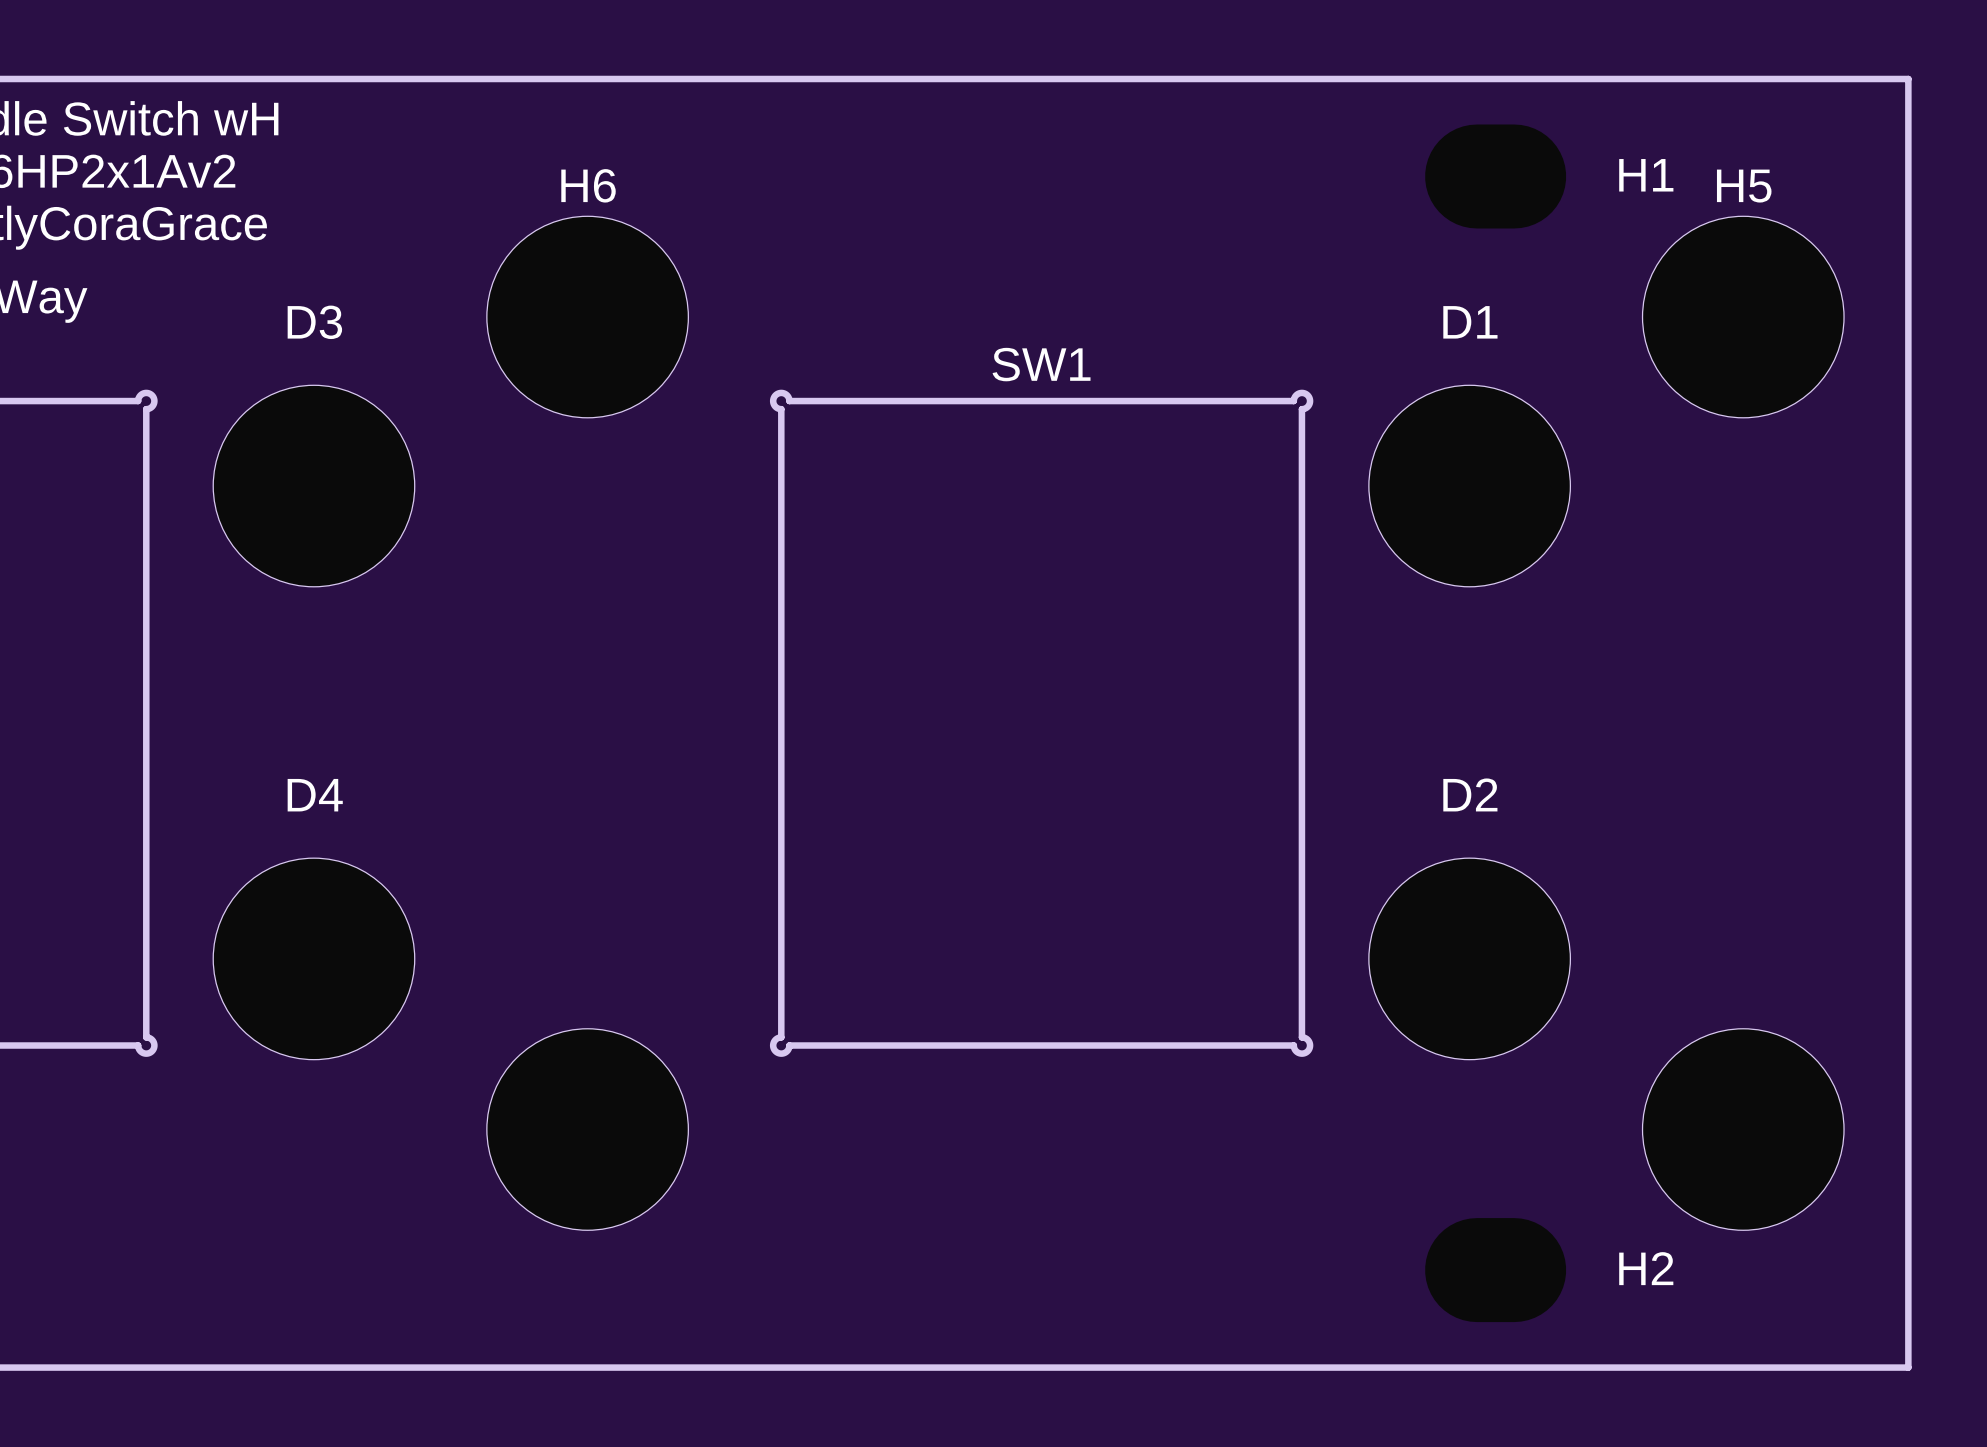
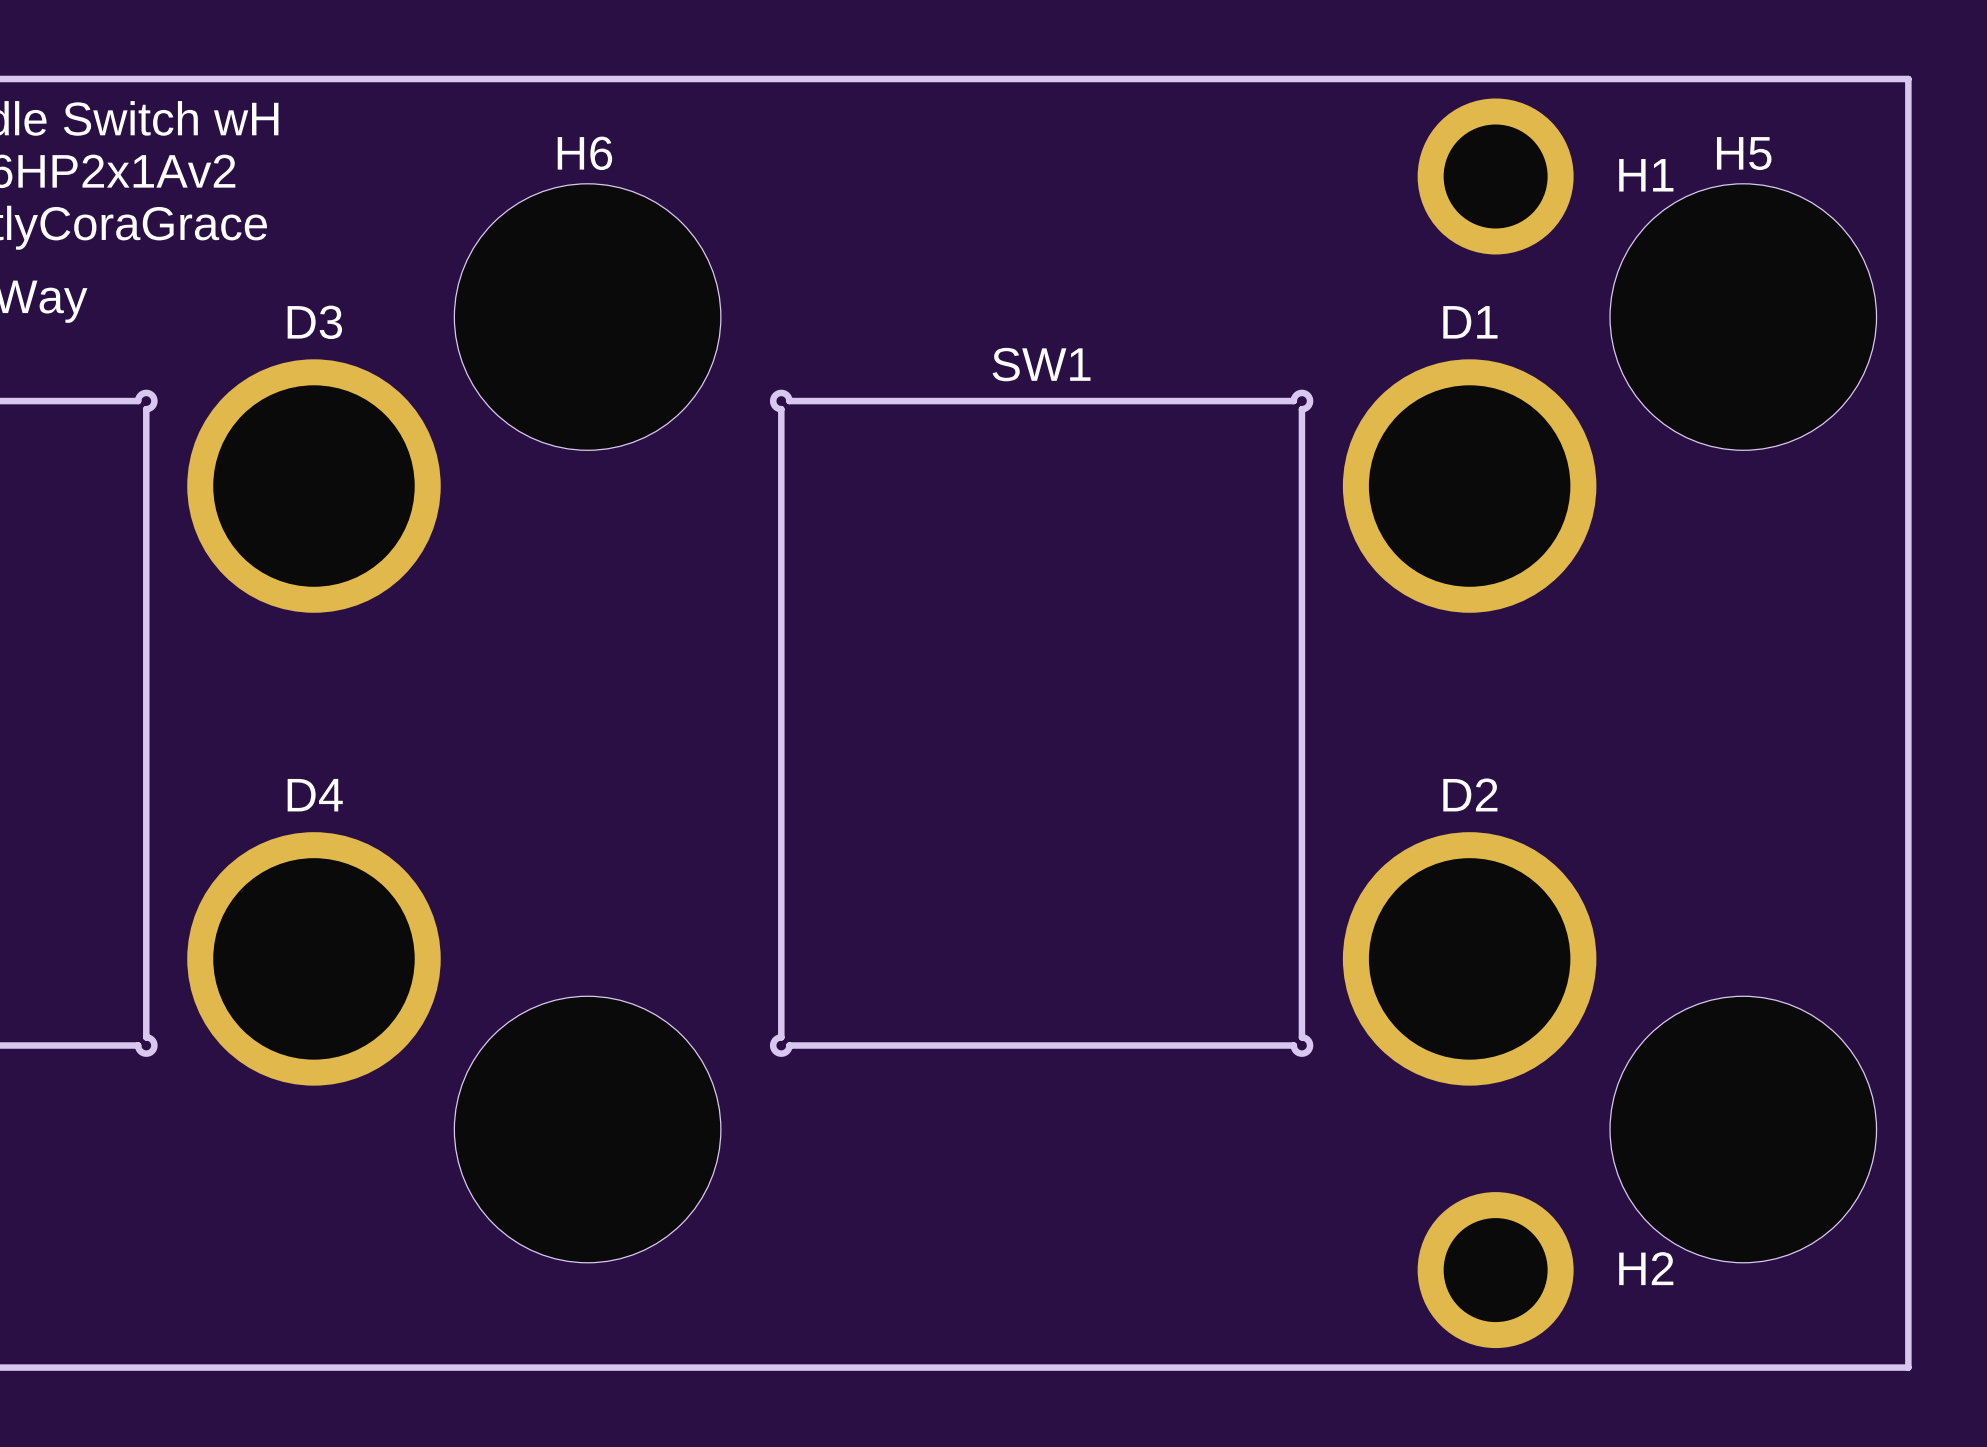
H1 footprint: [1425, 124, 1567, 229] -> [1417, 98, 1574, 255]
H6 footprint: [486, 216, 689, 1231] -> [454, 183, 721, 1263]
H5 footprint: [1642, 216, 1845, 1231] -> [1610, 183, 1877, 1263]
D3 footprint: [213, 385, 415, 587] -> [187, 359, 441, 613]
D1 footprint: [1368, 385, 1571, 587] -> [1342, 359, 1597, 613]
D4 footprint: [213, 858, 415, 1060] -> [187, 832, 441, 1086]
D2 footprint: [1368, 858, 1571, 1060] -> [1342, 832, 1597, 1086]
H2 footprint: [1425, 1218, 1567, 1323] -> [1417, 1192, 1574, 1349]

